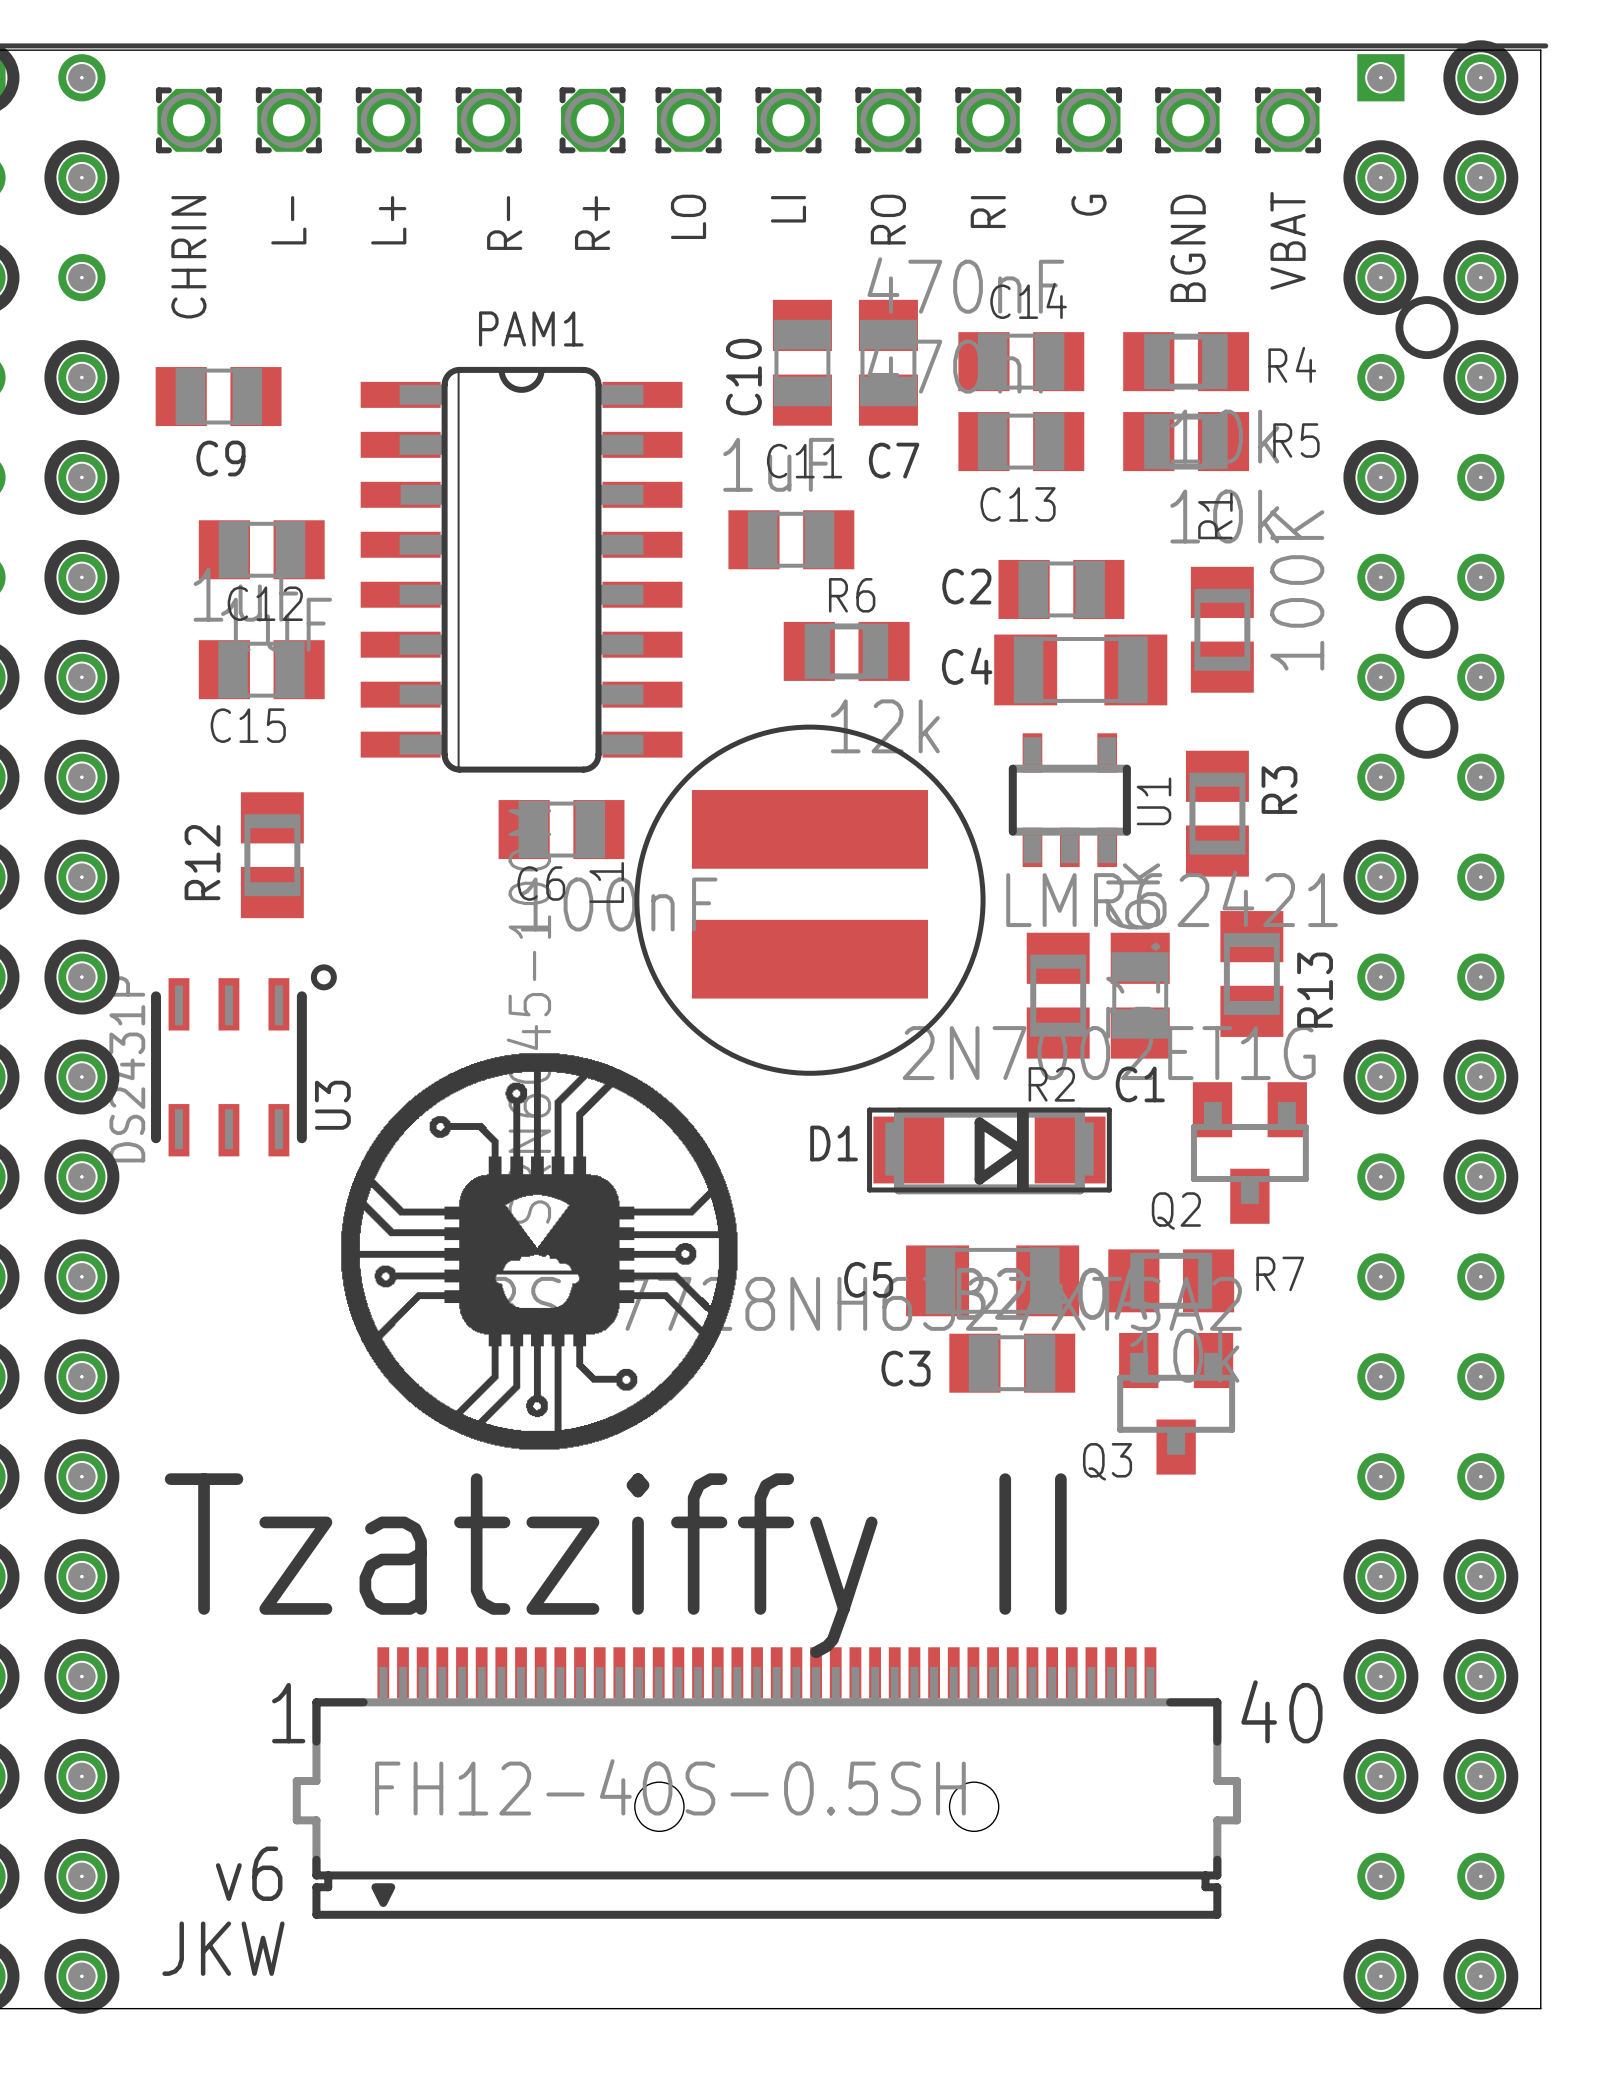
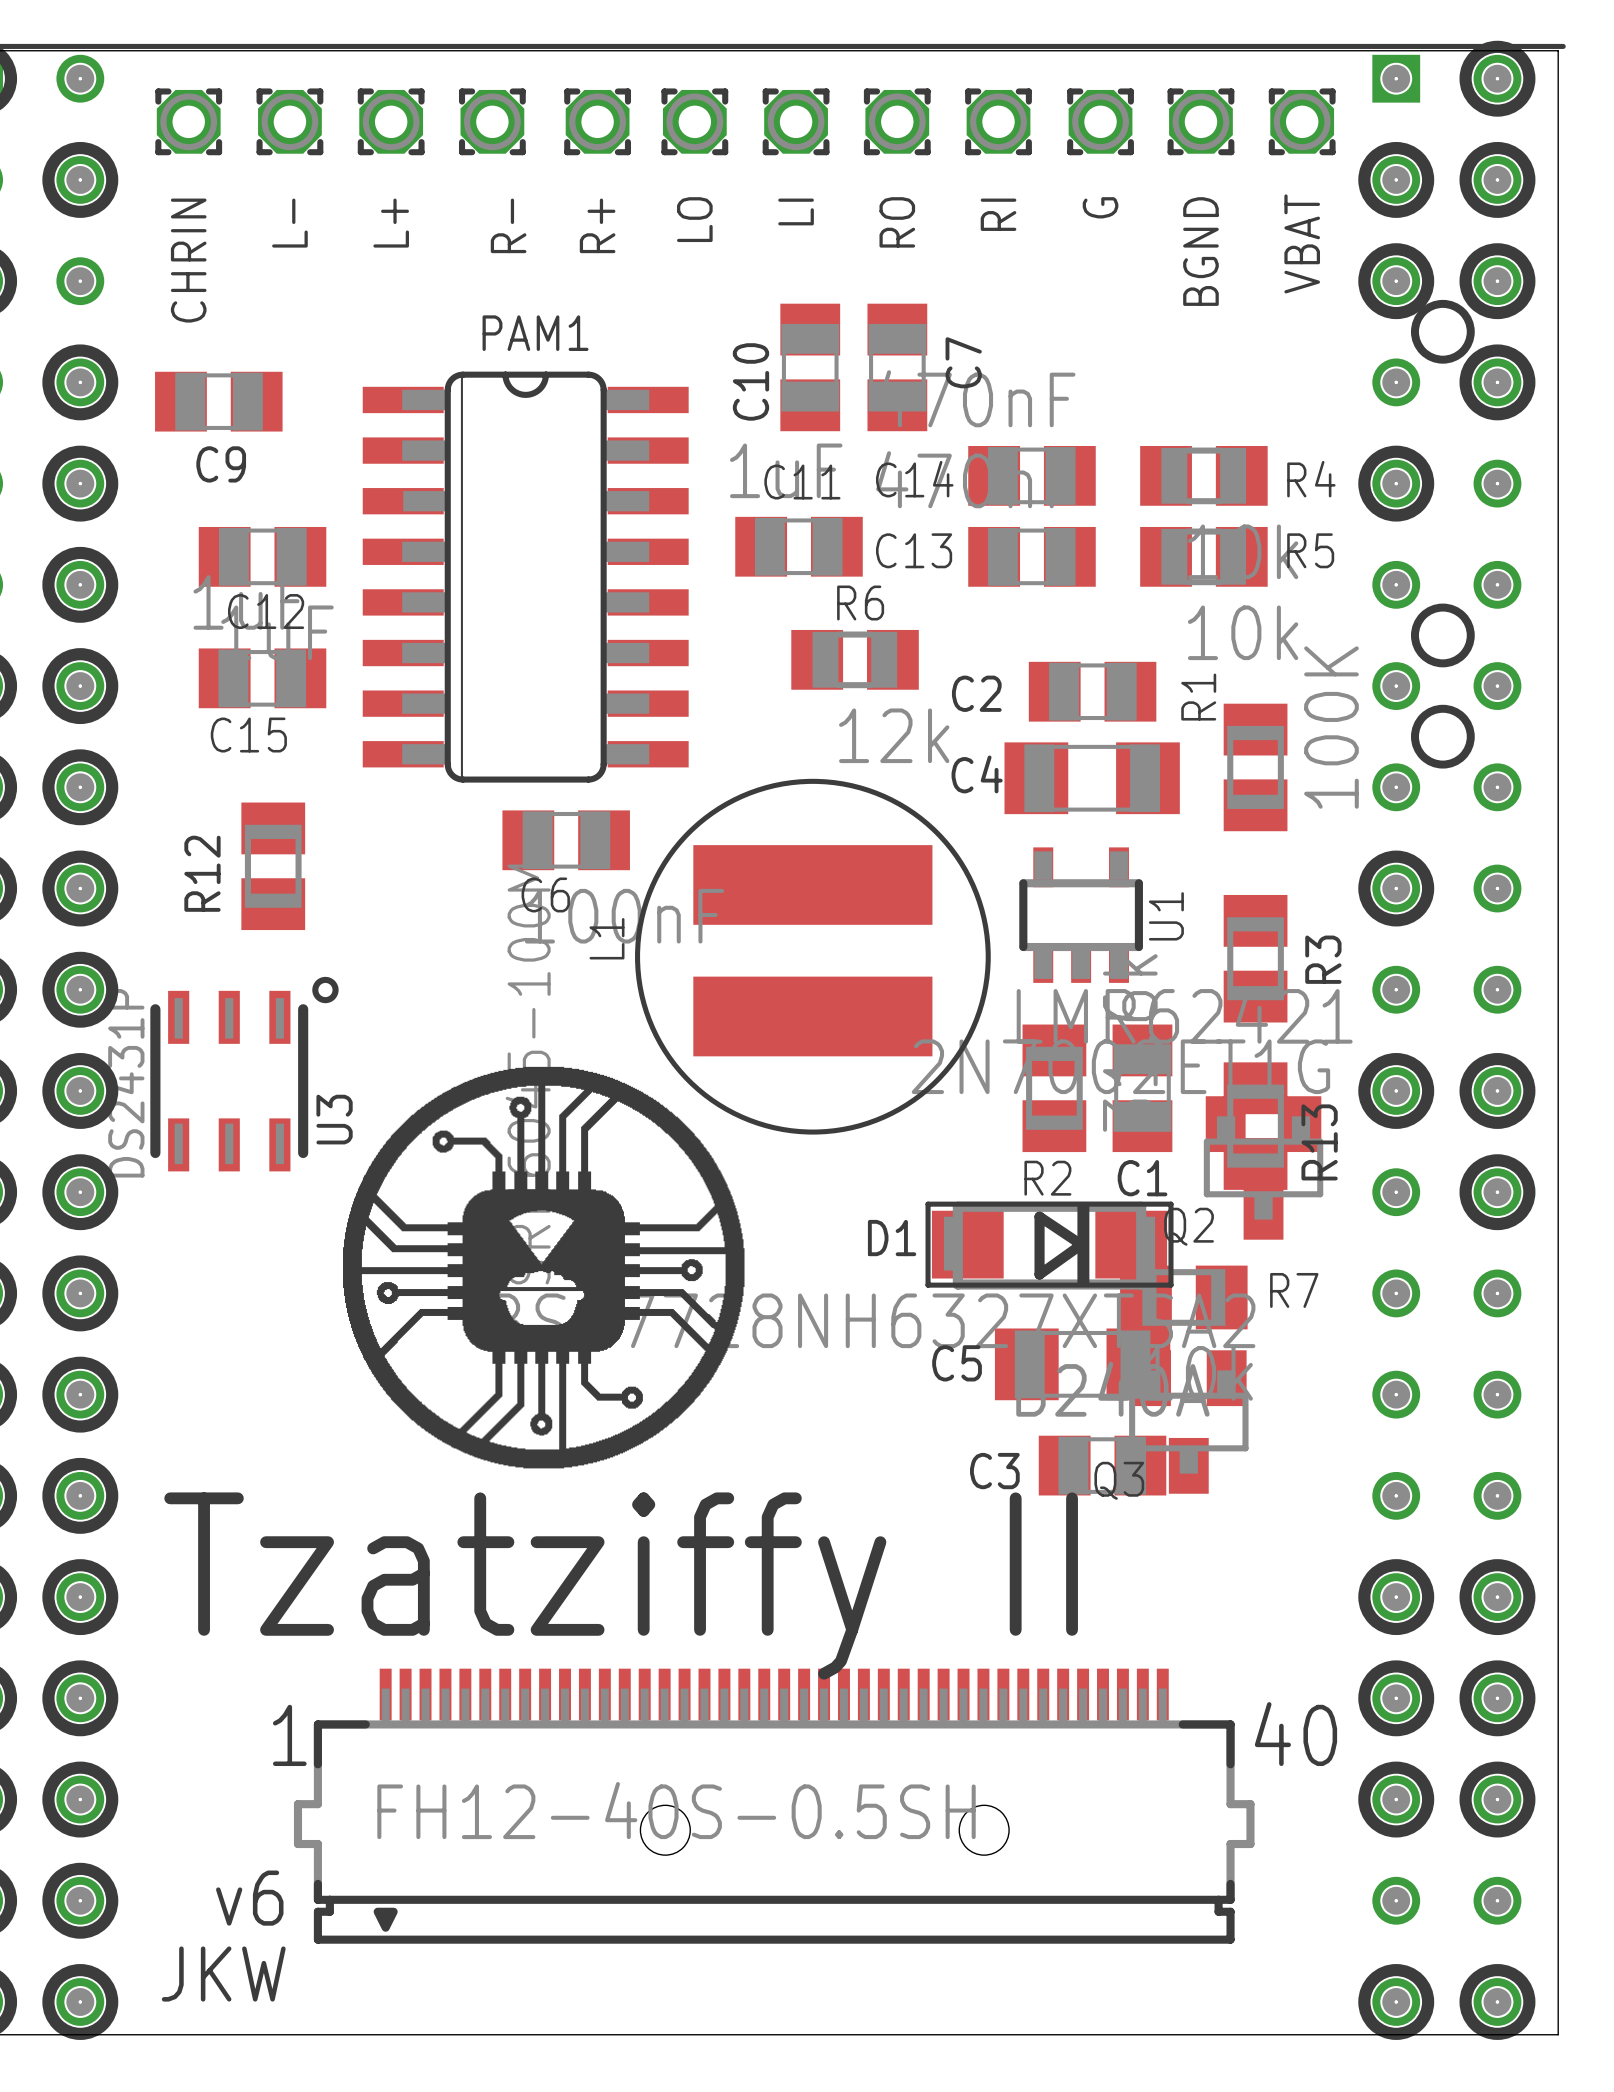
C14 name position: C14 (1028, 300) -> C14 (914, 479)
C14 position: (1021, 361) -> (1031, 475)
R4 position: (1186, 361) -> (1203, 475)
R5 name position: R5 (1296, 440) -> R5 (1310, 550)
C13 position: (1021, 441) -> (1031, 556)
R5 position: (1186, 441) -> (1203, 556)
C7 name rotation: 0° (894, 460) -> 90° counterclockwise (963, 362)
C7 name position: C7 (894, 460) -> C7 (963, 362)
C11 name position: C11 (804, 461) -> C11 (802, 482)
C13 name position: C13 (1018, 504) -> C13 (914, 550)
R1 name position: R1 (1215, 516) -> R1 (1198, 697)
C2 name position: C2 (966, 586) -> C2 (976, 693)
C2 position: (1061, 589) -> (1092, 691)
R1 position: (1222, 629) -> (1255, 767)
C4 position: (1080, 669) -> (1092, 778)
R3 name position: R3 (1279, 790) -> R3 (1323, 959)
U1 position: (1069, 800) -> (1081, 915)
R3 position: (1217, 813) -> (1255, 958)
L1 position: (809, 900) -> (812, 956)
R13 position: (1251, 974) -> (1255, 1126)
R2 position: (1058, 995) -> (1054, 1088)
C1 position: (1140, 995) -> (1142, 1088)
D1 position: (989, 1150) -> (1049, 1245)
C5 position: (992, 1280) -> (1082, 1364)
C3 position: (1012, 1363) -> (1102, 1465)

